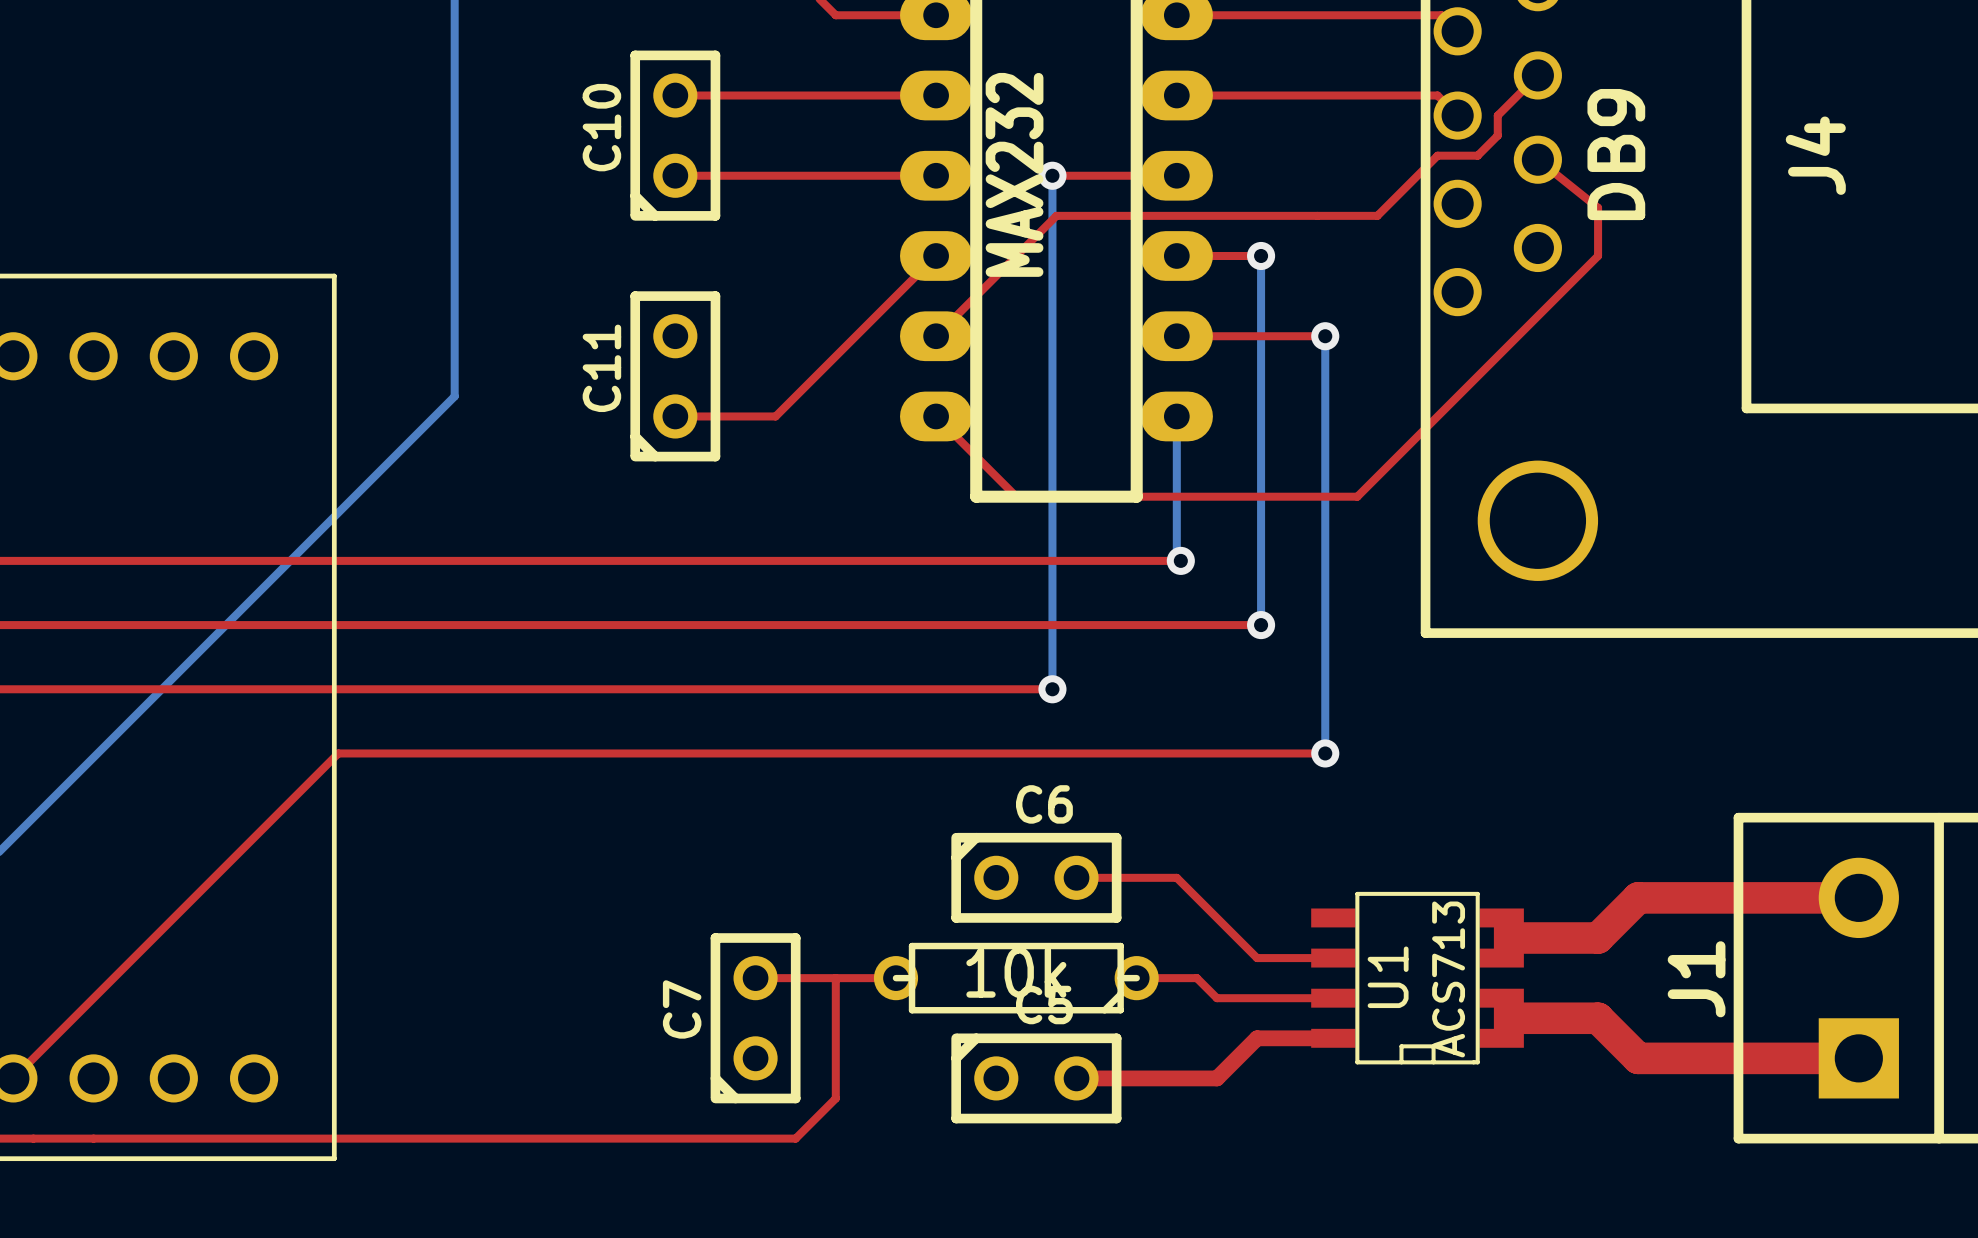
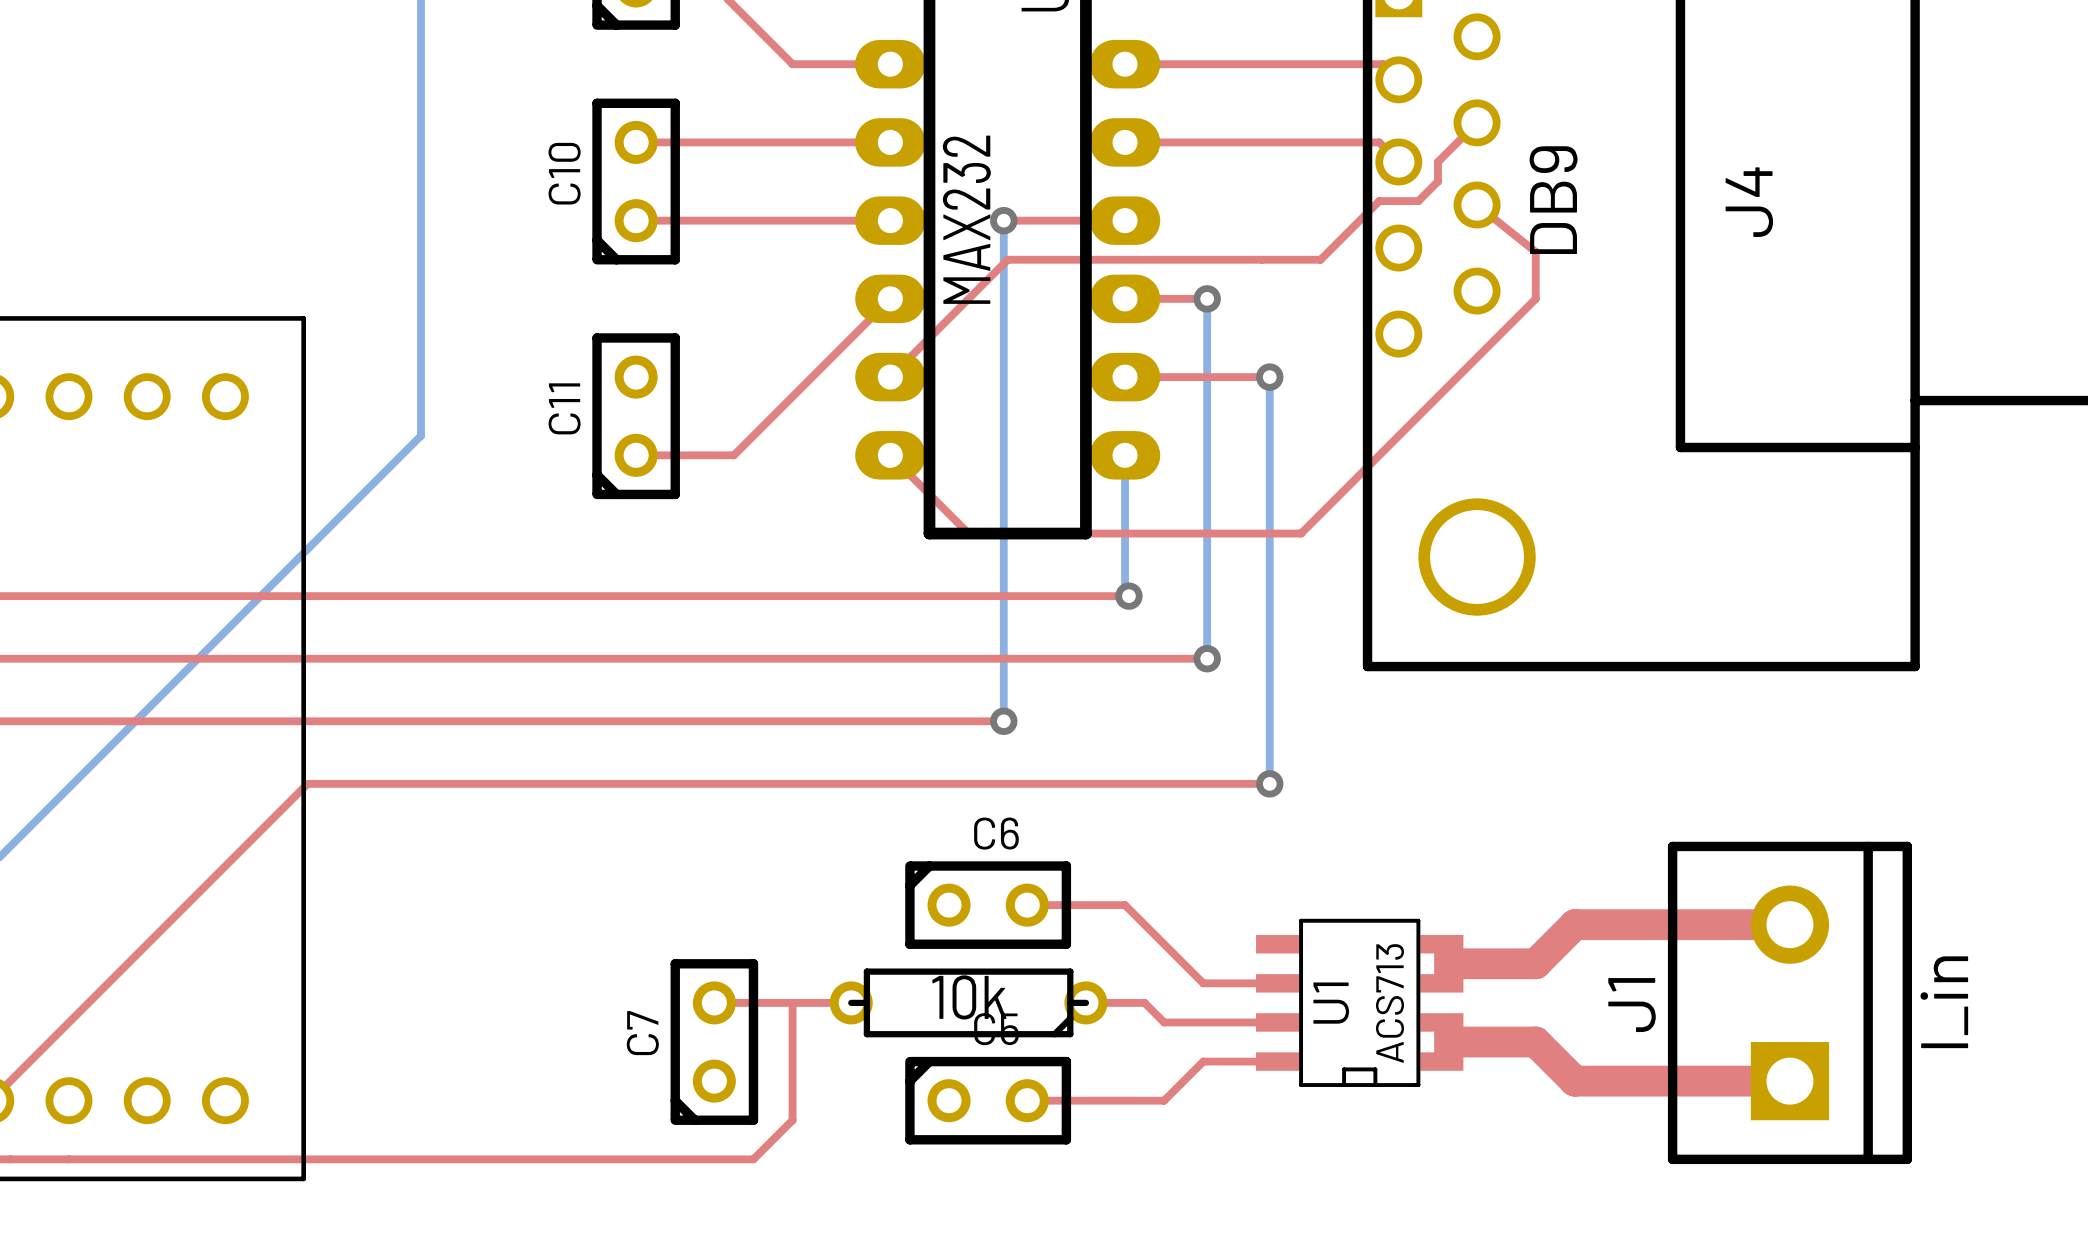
top track width: thick (1333, 1038) (1257, 1038) (1216, 1078) (1076, 1078) -> thin (1277, 1061) (1203, 1061) (1164, 1100) (1027, 1100)

